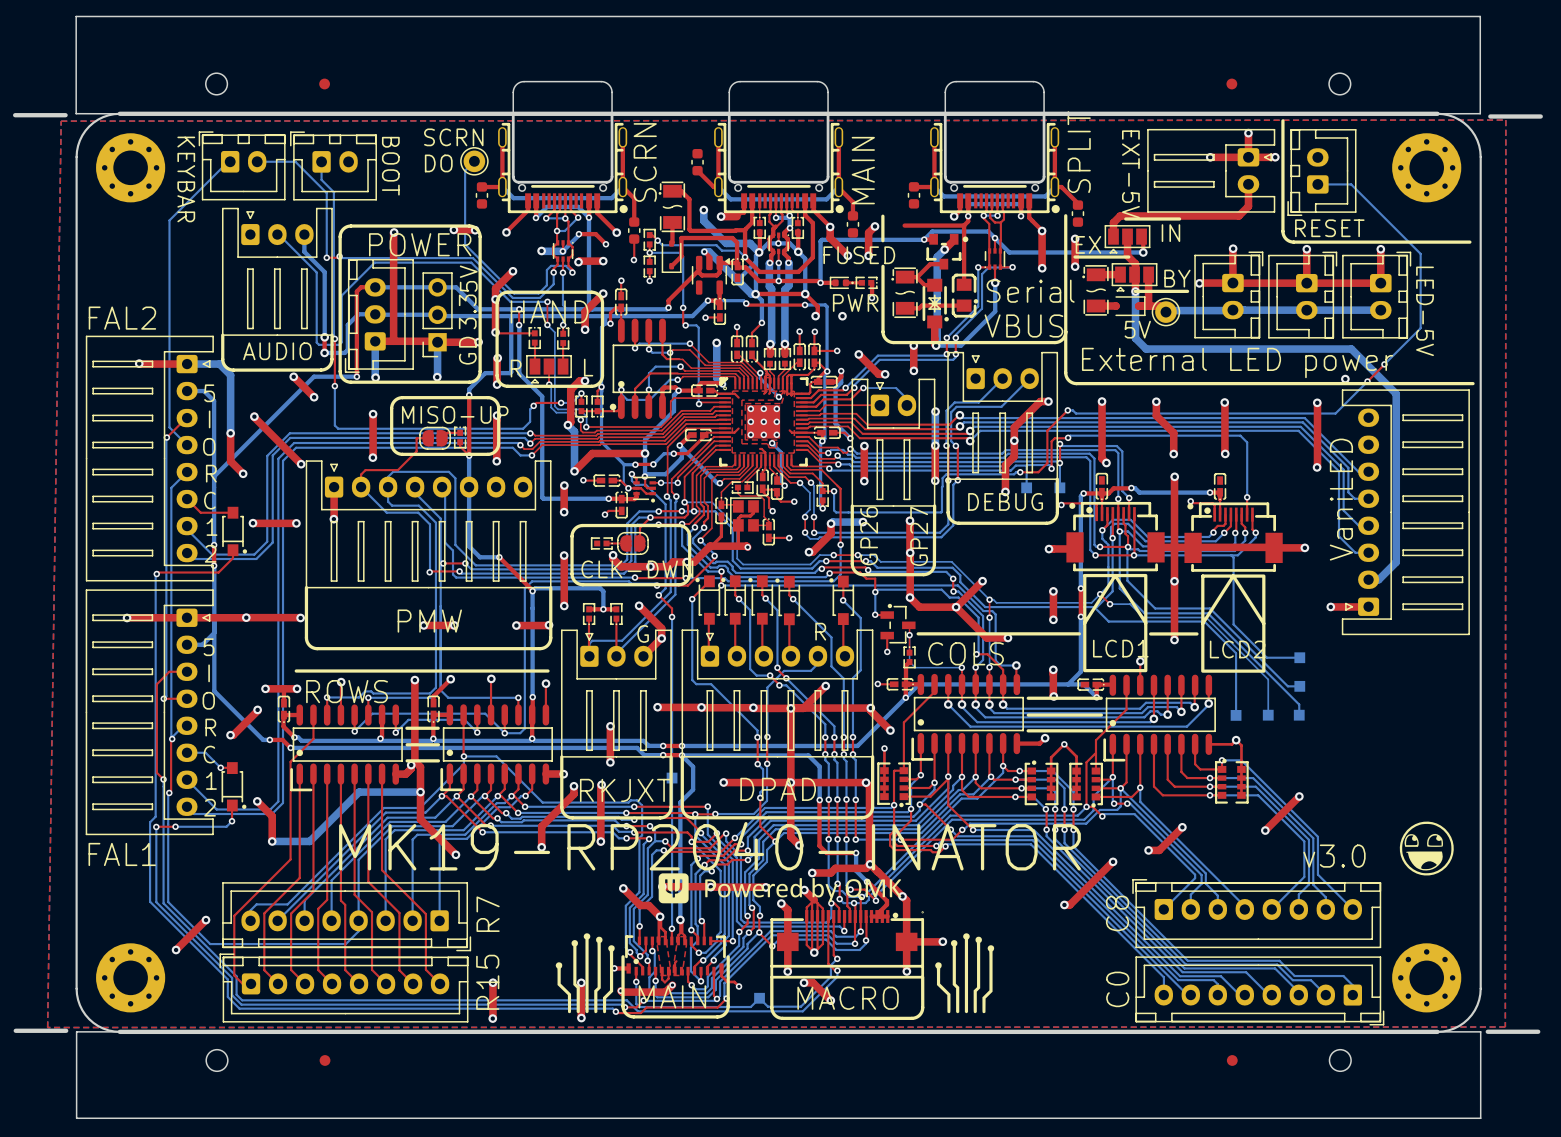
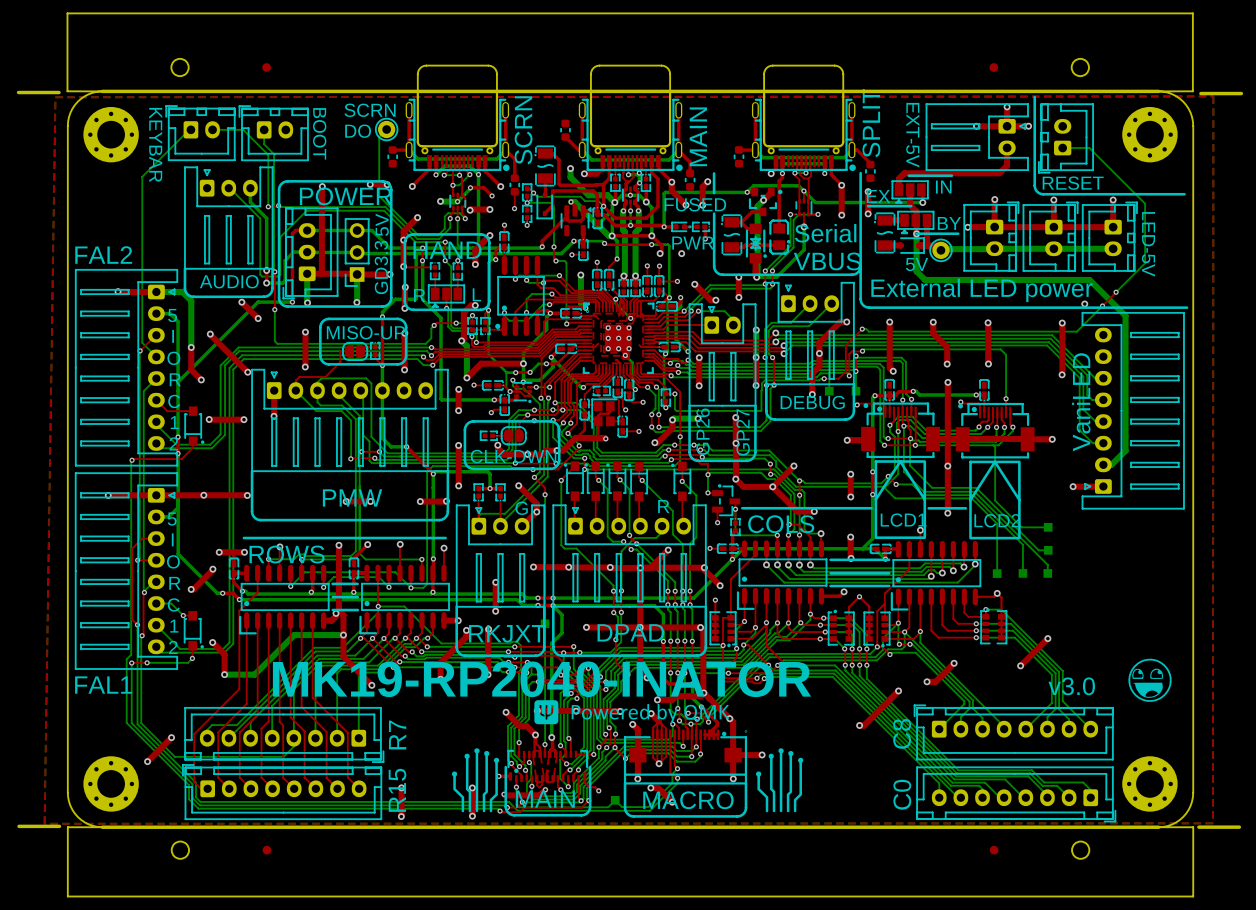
top track: (968, 221) (963, 225) (904, 225) -> (782, 177) (779, 181)

